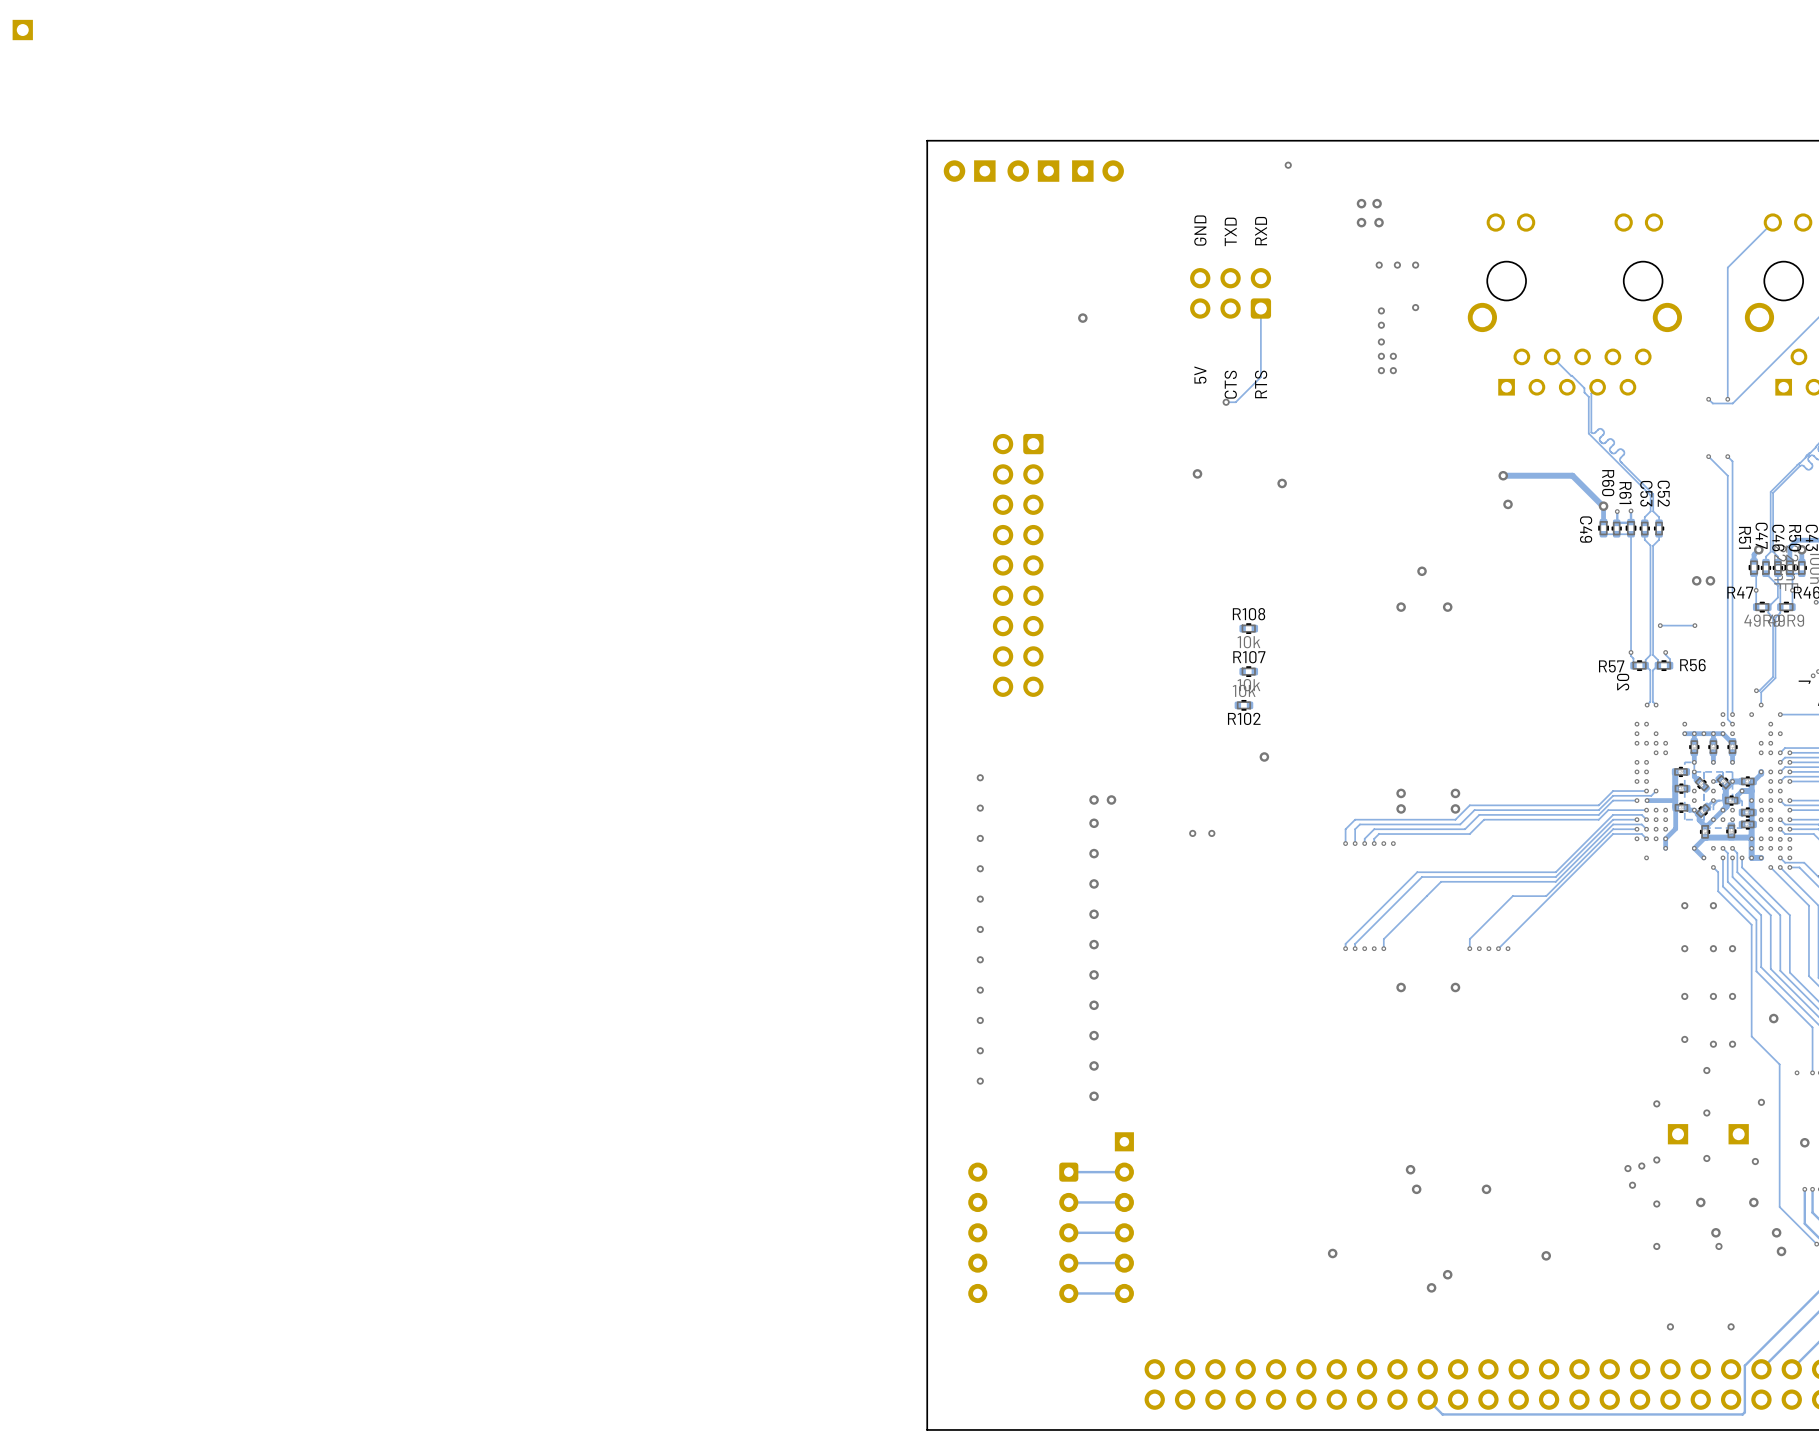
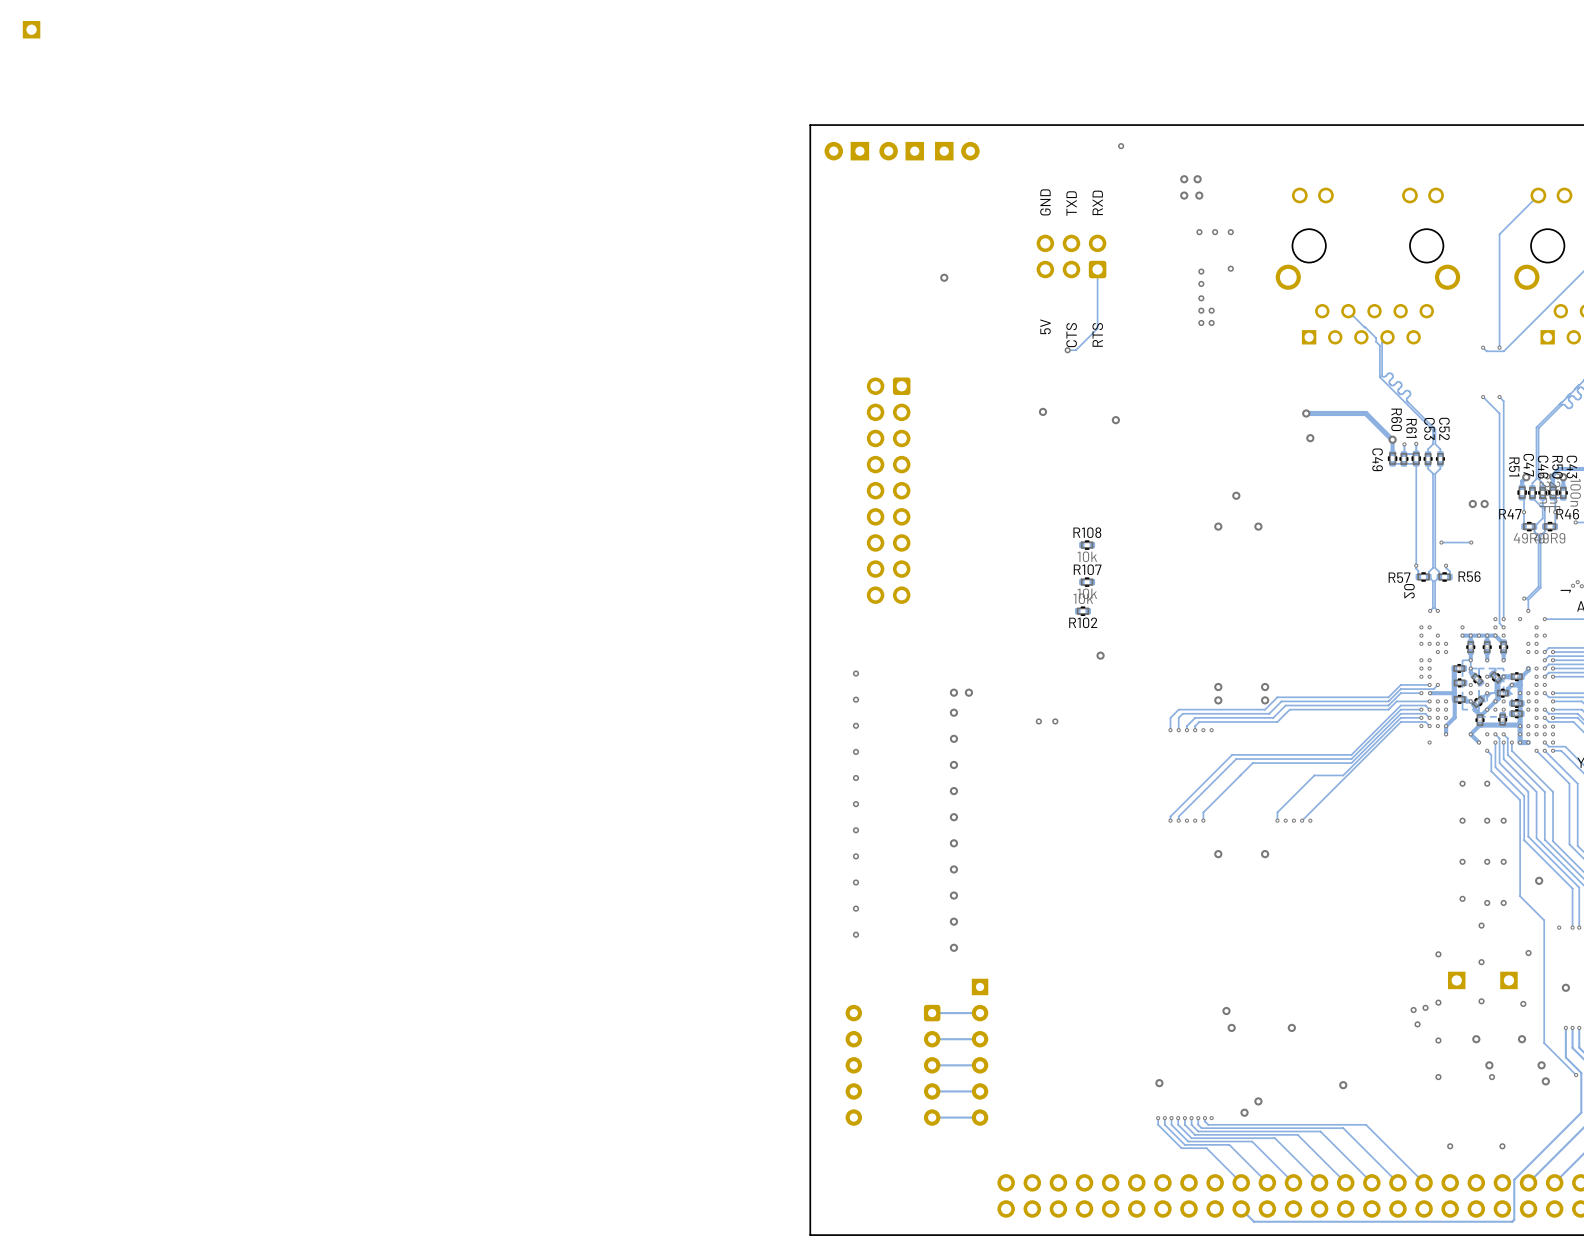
track: none -> (1158, 1118) (1158, 1124) (1181, 1148) (1206, 1148) (1241, 1182)
via: none -> (1158, 1118)
track: none -> (1164, 1118) (1164, 1124) (1184, 1144) (1229, 1144) (1267, 1182)
via: none -> (1164, 1118)
track: none -> (1171, 1118) (1171, 1124) (1188, 1141) (1252, 1141) (1293, 1182)
via: none -> (1171, 1118)
track: none -> (1178, 1118) (1178, 1124) (1191, 1138) (1274, 1138) (1319, 1182)
via: none -> (1178, 1118)
track: none -> (1184, 1118) (1184, 1124) (1194, 1134) (1297, 1134) (1345, 1182)
via: none -> (1184, 1118)
track: none -> (1191, 1118) (1191, 1124) (1198, 1131) (1320, 1131) (1371, 1182)
via: none -> (1191, 1118)
track: none -> (1198, 1118) (1198, 1124) (1201, 1128) (1343, 1128) (1397, 1182)
via: none -> (1198, 1118)
track: none -> (1204, 1118) (1208, 1124) (1366, 1124) (1424, 1182)
via: none -> (1204, 1118)
via: none -> (1211, 1118)

